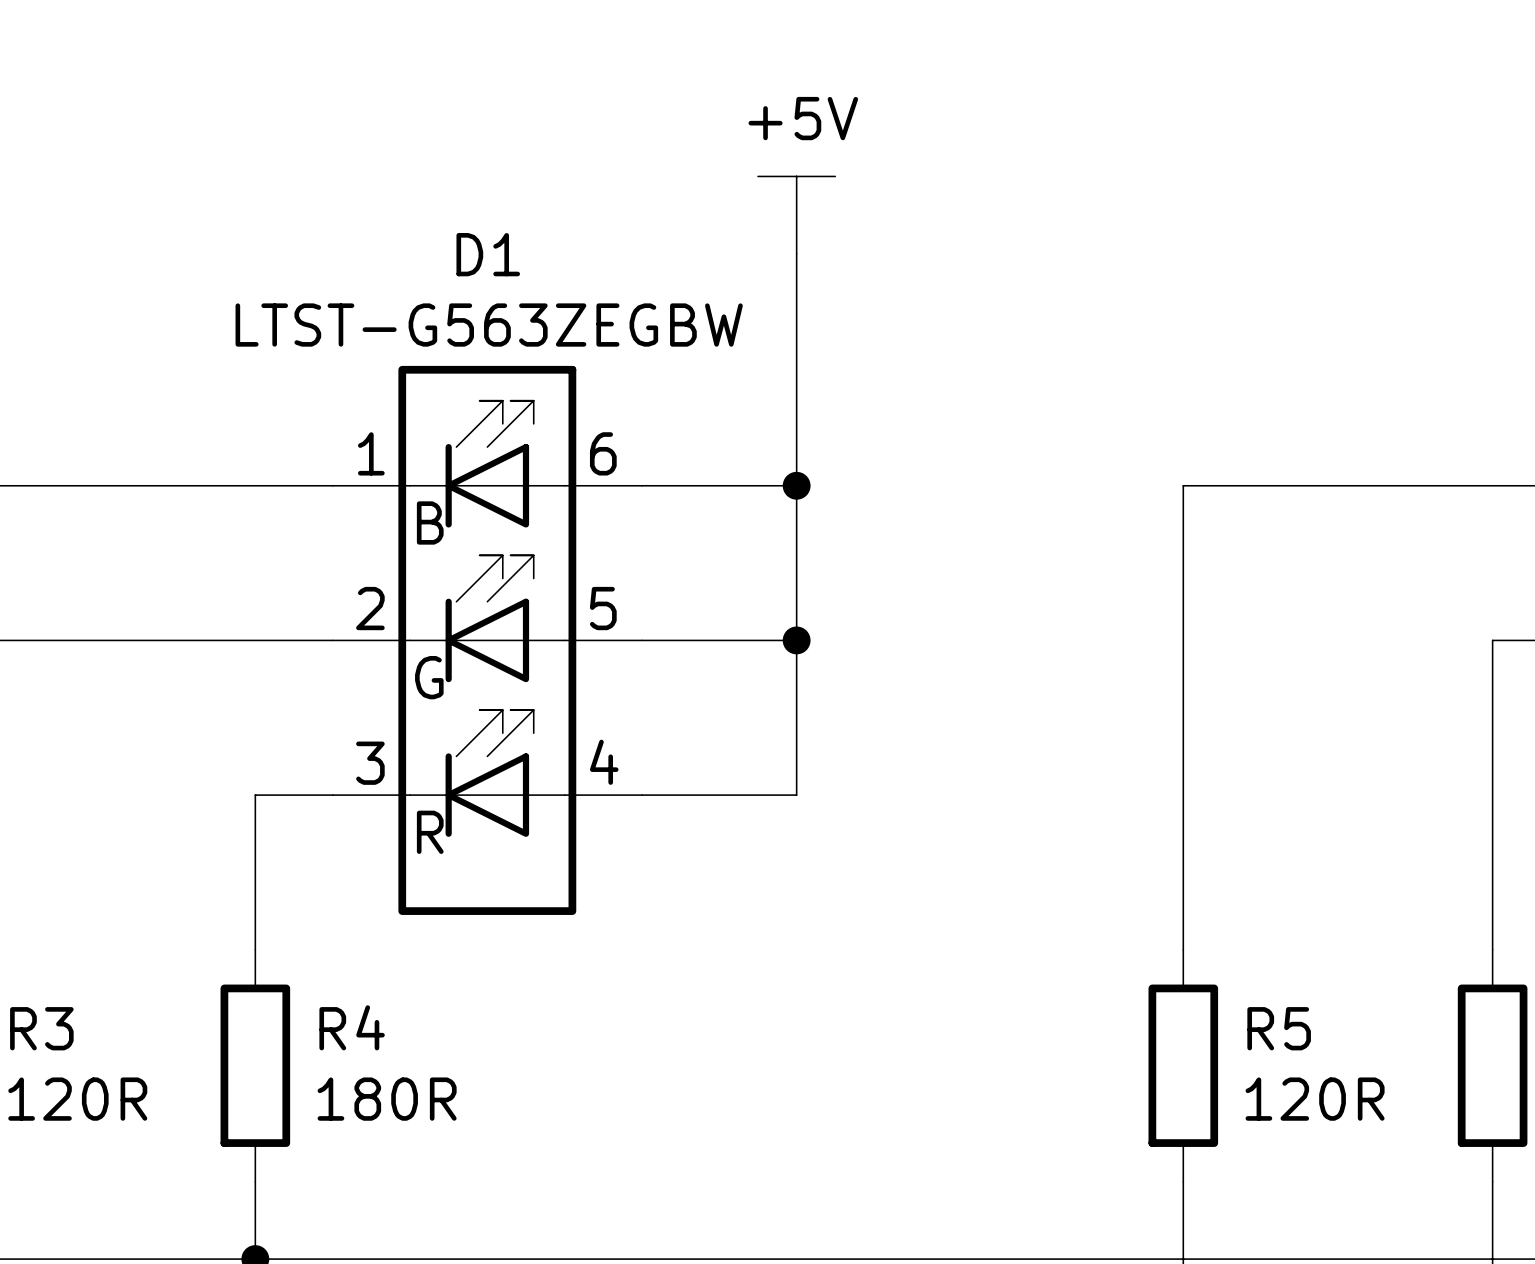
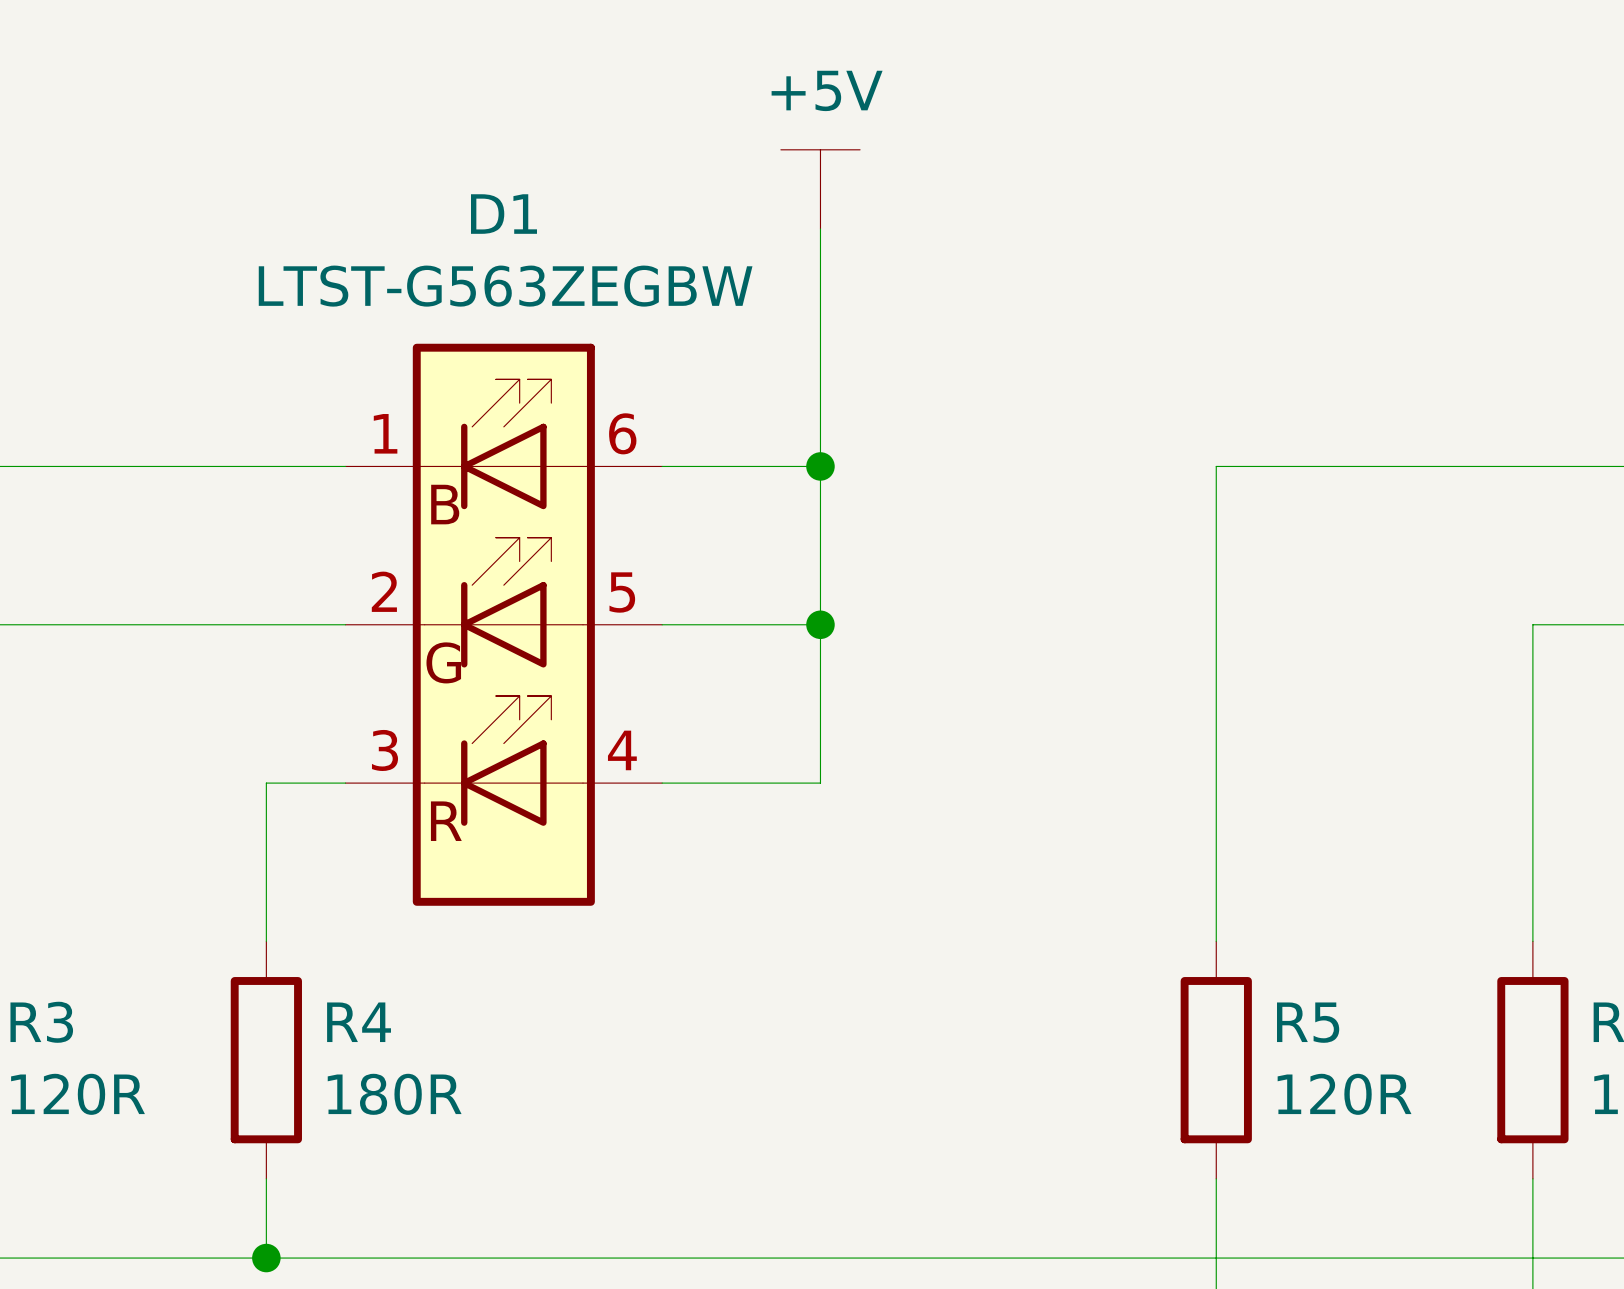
D1 name position: D1 (488, 254) -> D1 (503, 214)
D1 value position: LTST-G563ZEGBW (489, 325) -> LTST-G563ZEGBW (505, 286)

